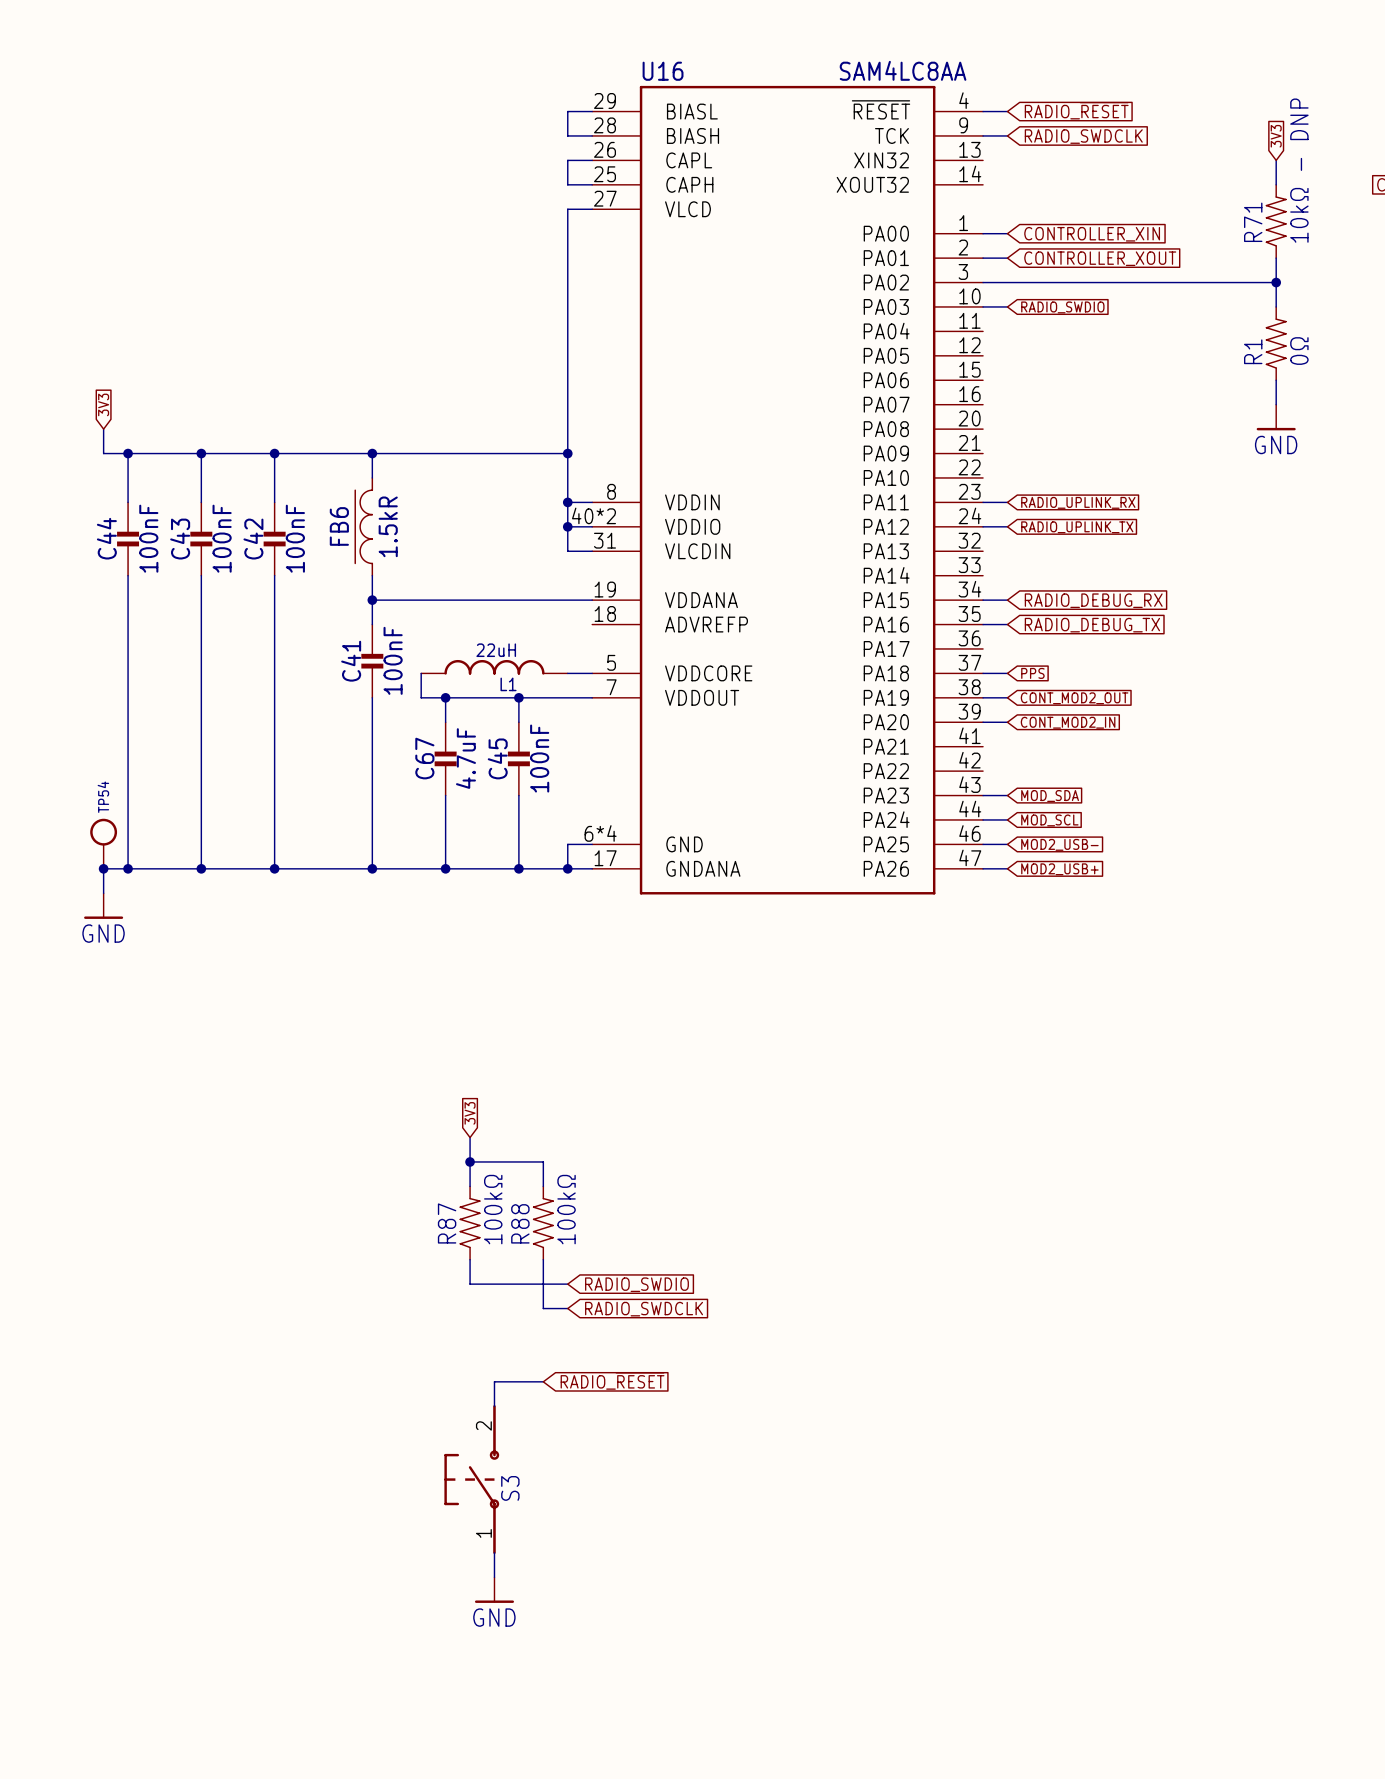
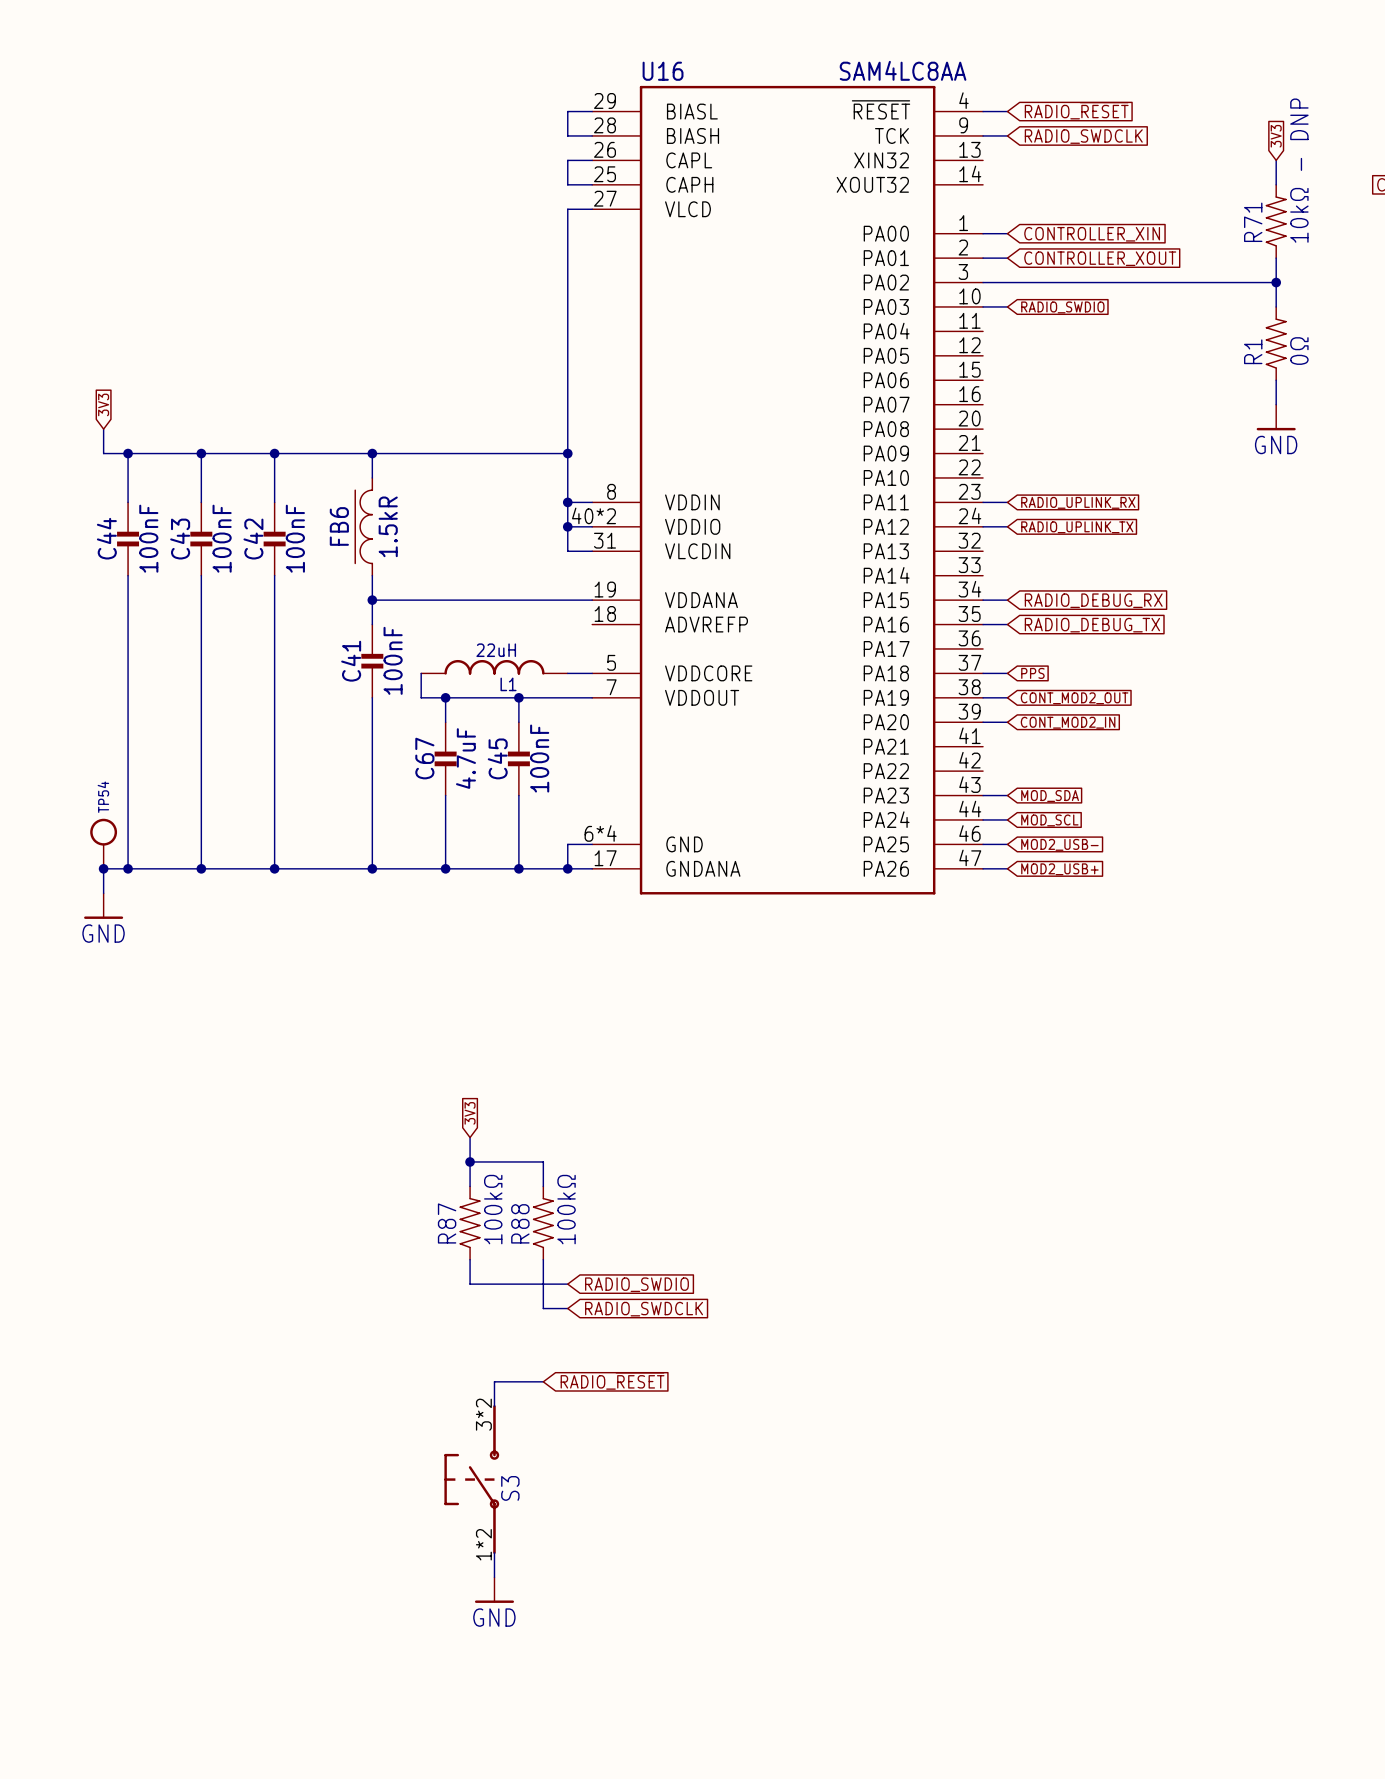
S3 pin number: 2 (483, 1425) -> 3*2 (483, 1414)
S3 pin number: 1 (483, 1533) -> 1*2 (483, 1544)

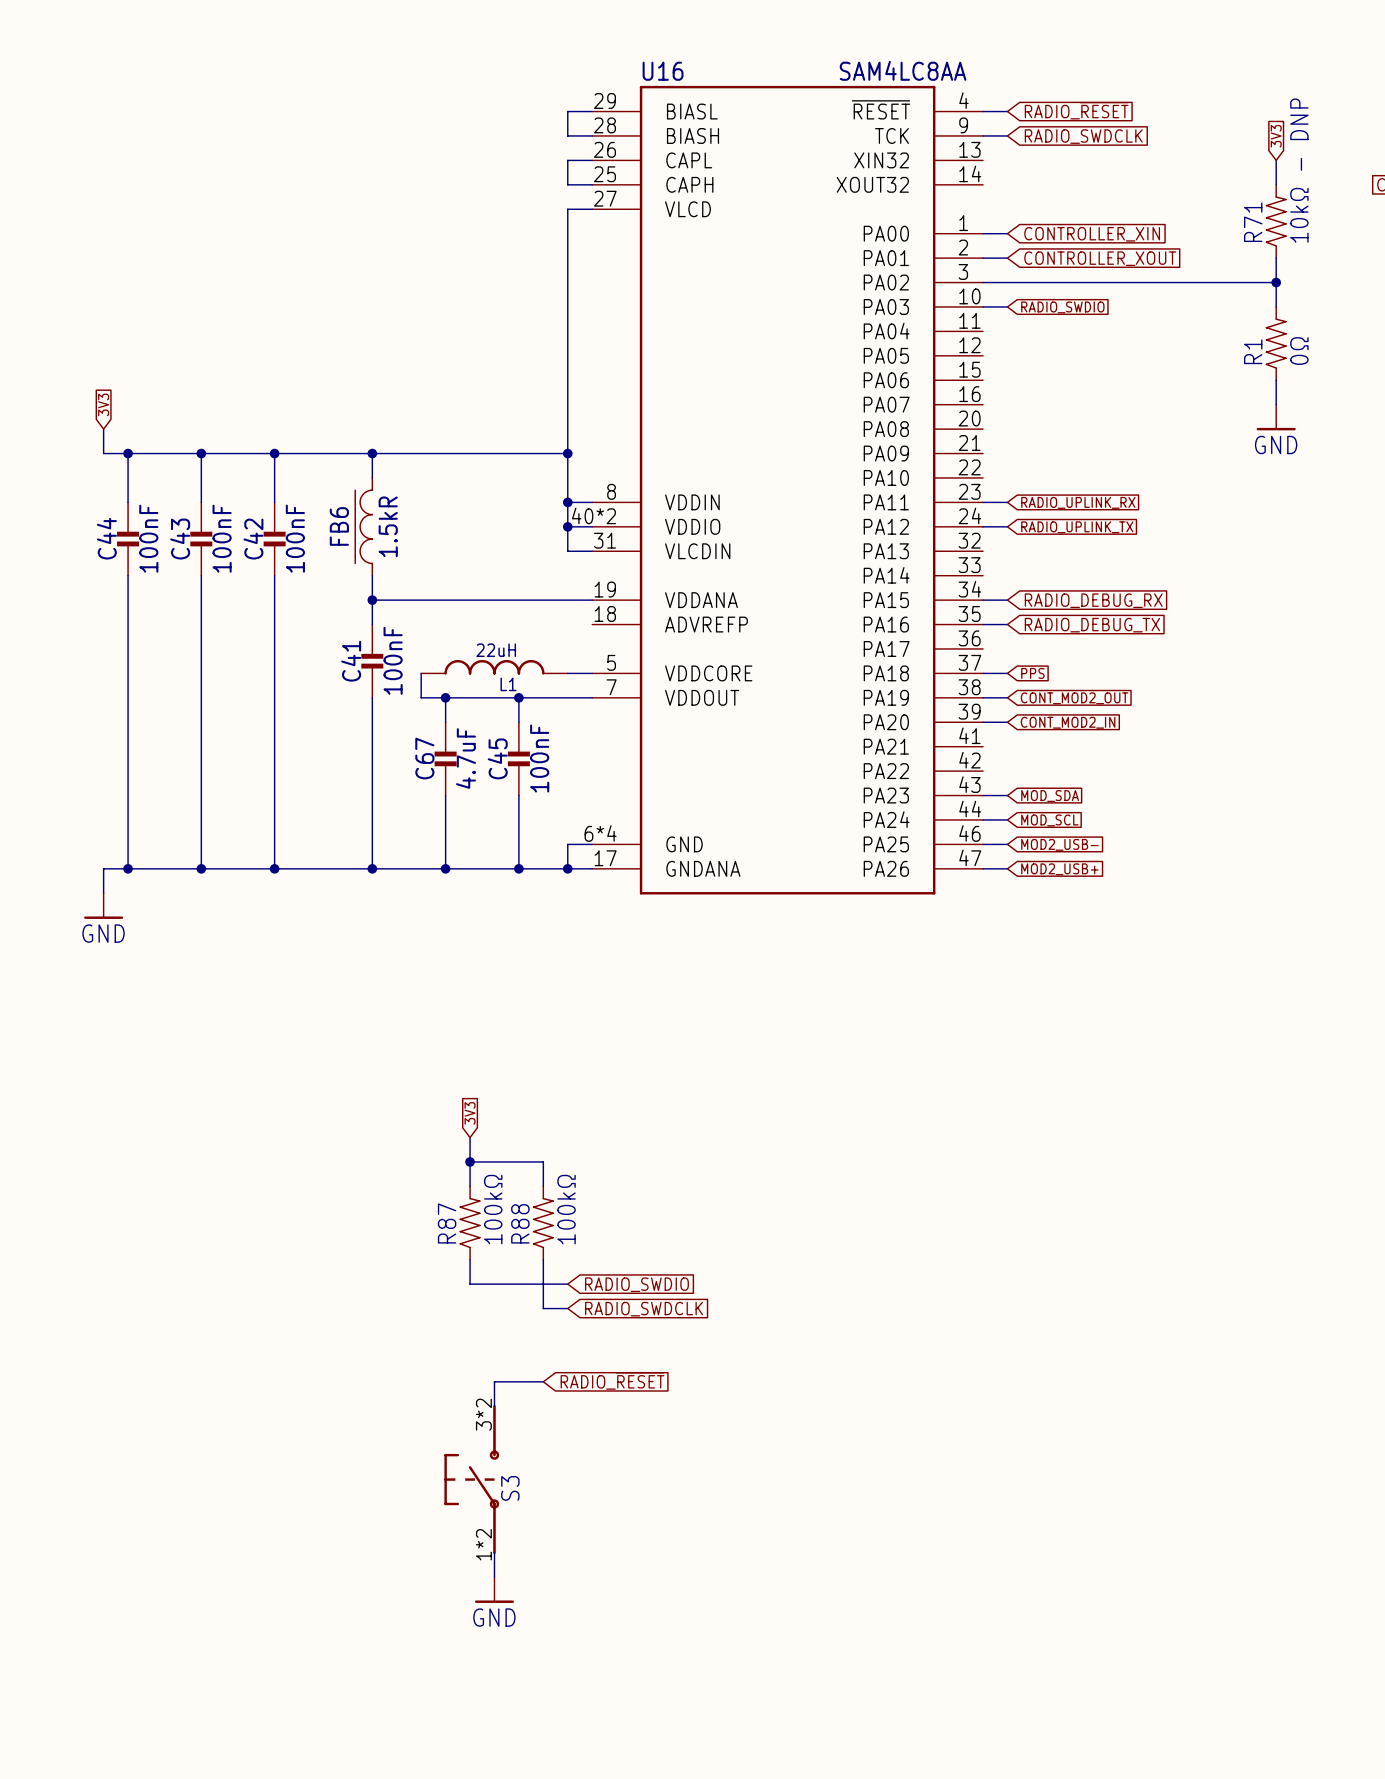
TP54: (103, 843) -> none
junction: (103, 868) -> none

